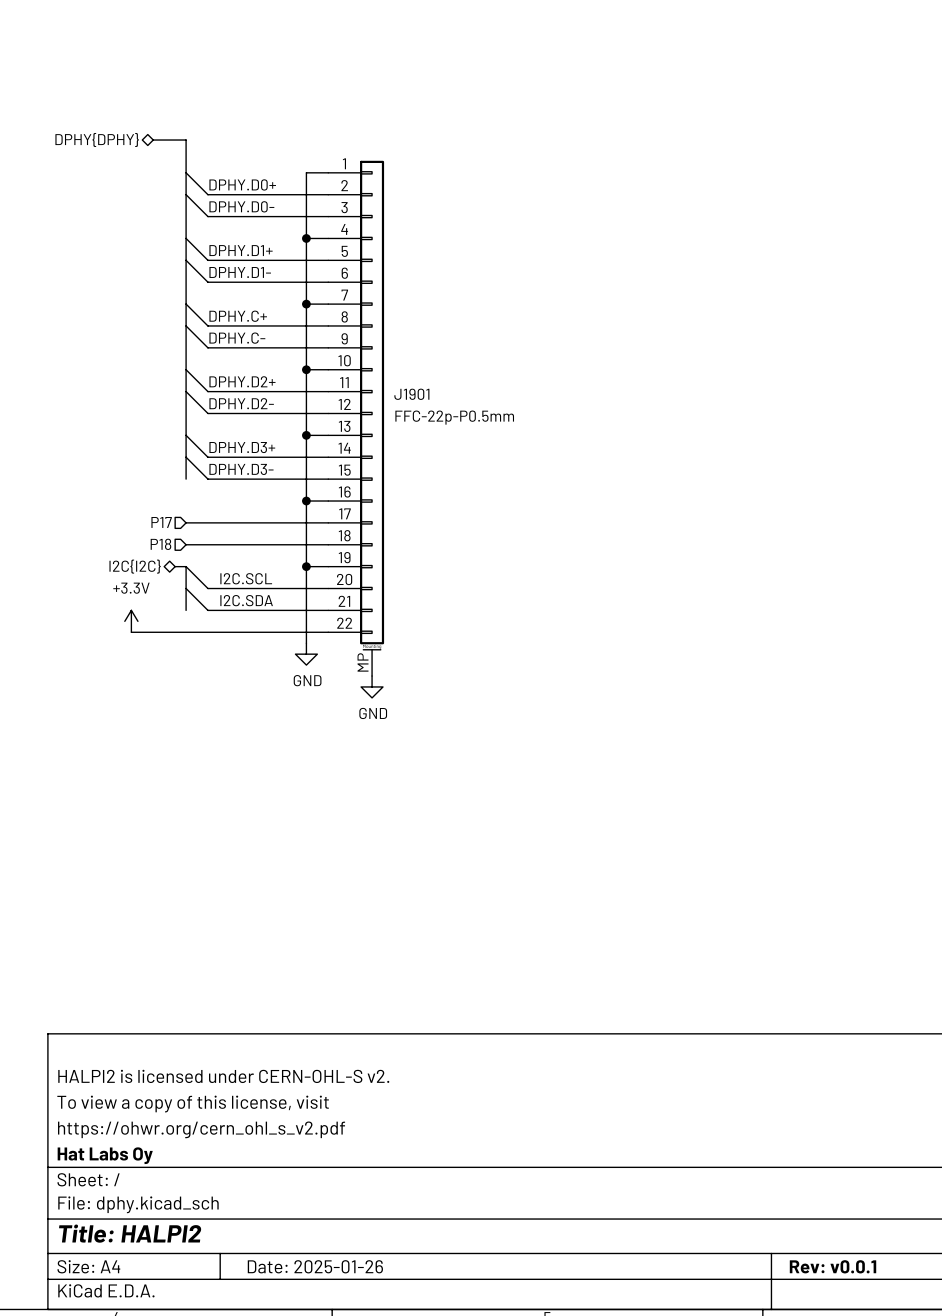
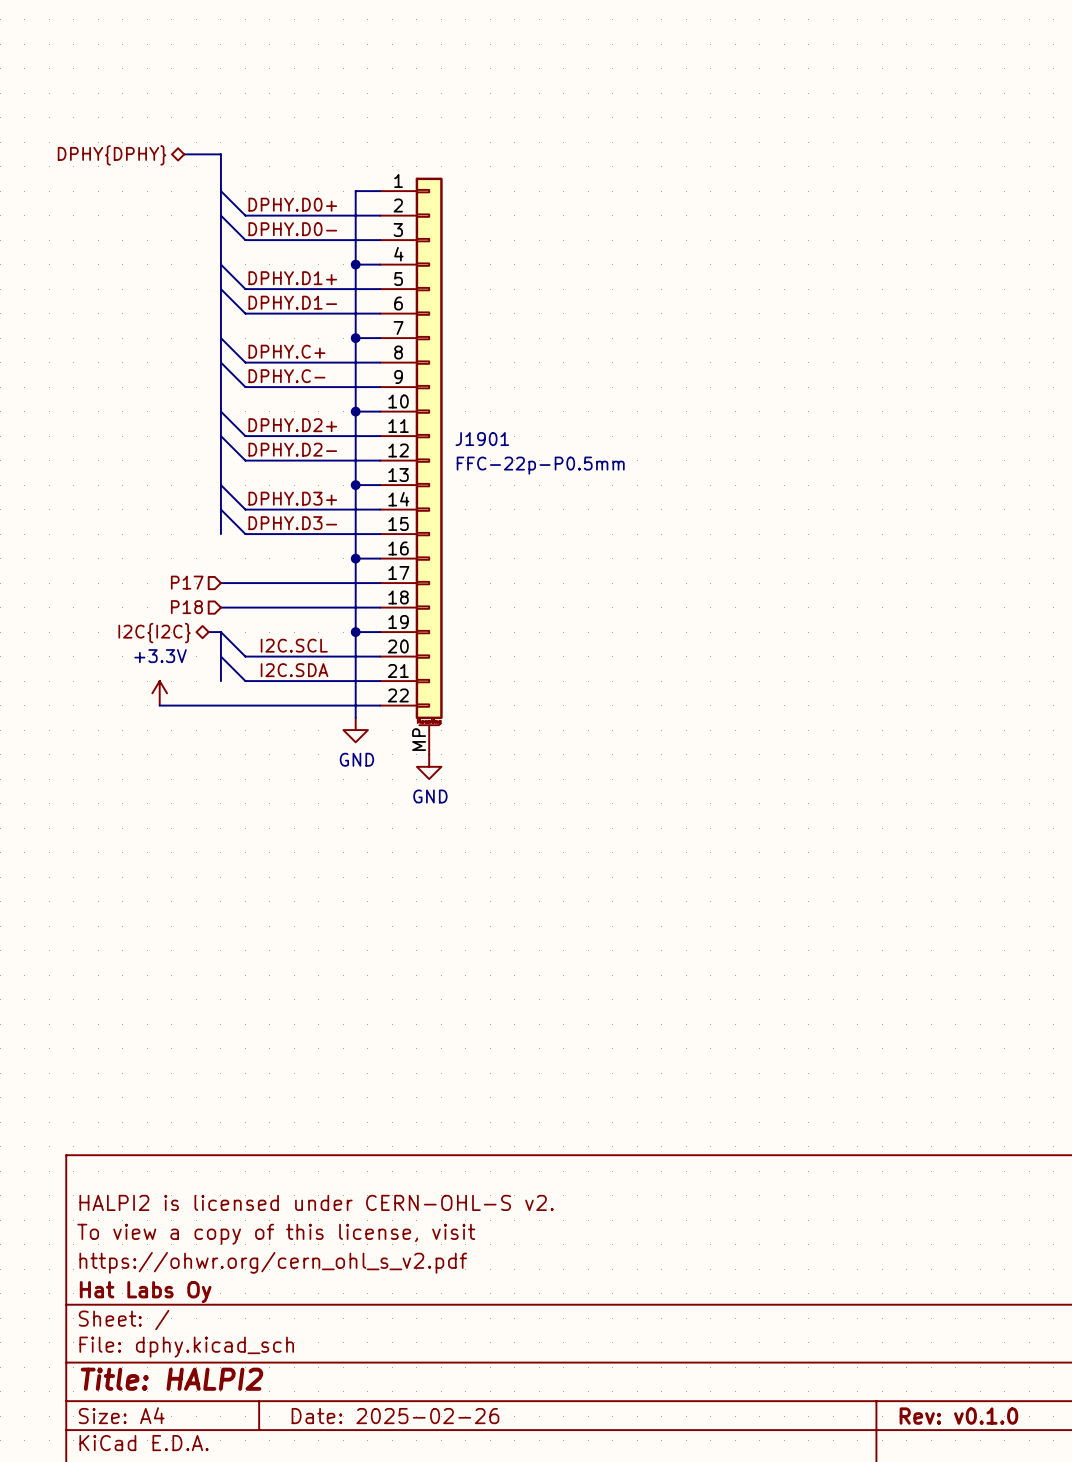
title block: Date: 2025-01-26 (315, 1266) -> Date: 2025-02-26 (395, 1416)
title block: Rev: v0.0.1 (833, 1266) -> Rev: v0.1.0 (958, 1416)

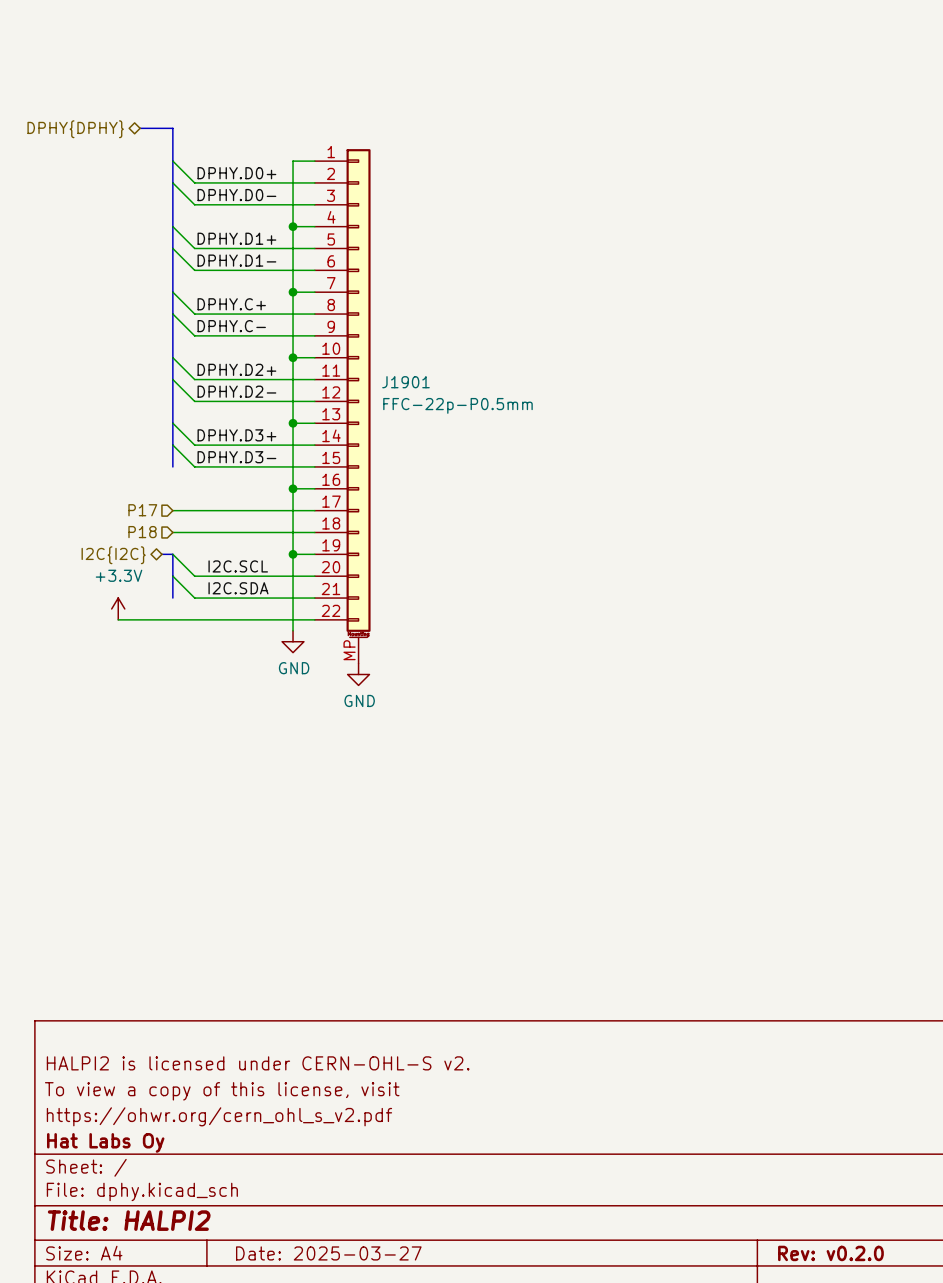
title block: Date: 2025-02-26 (395, 1416) -> Date: 2025-03-27 (328, 1253)
title block: Rev: v0.1.0 (958, 1416) -> Rev: v0.2.0 (830, 1253)

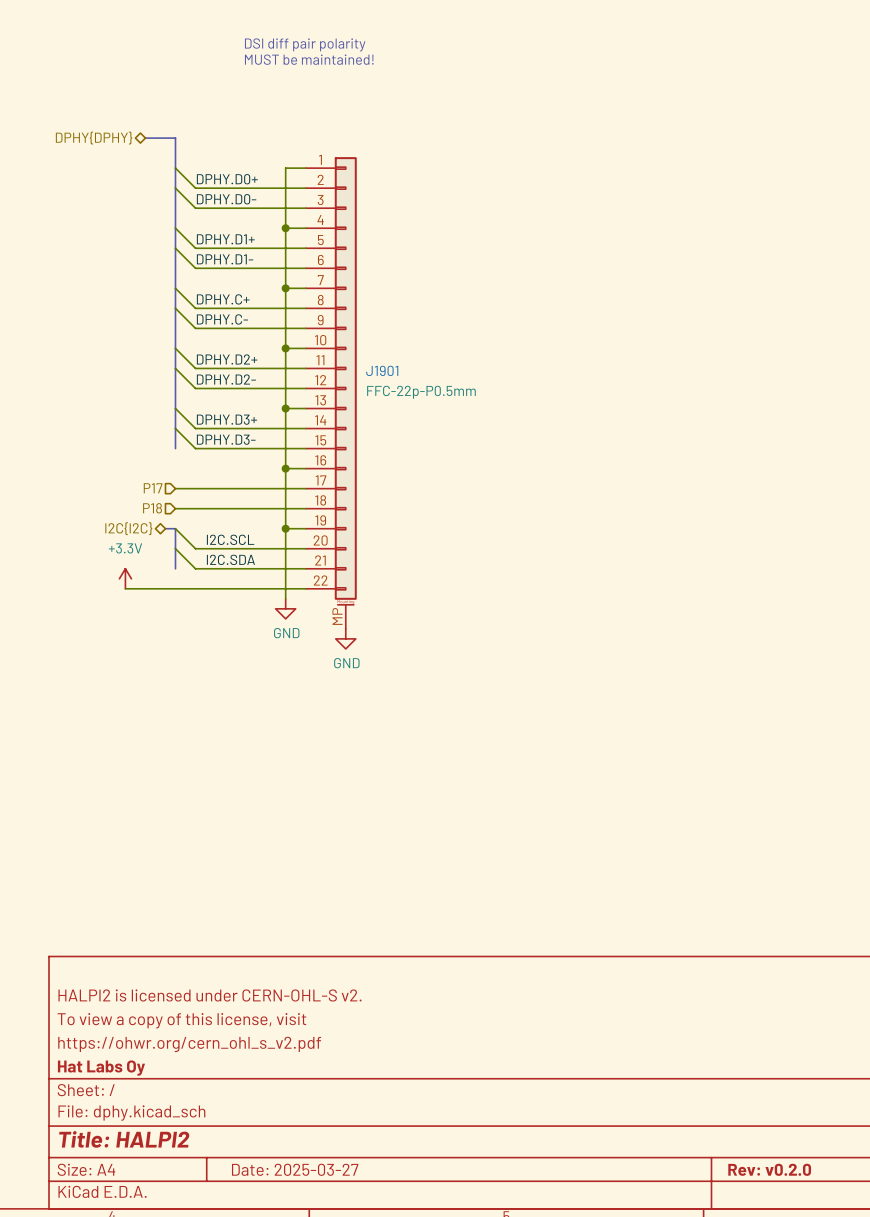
text: none -> DSI diff pair polarity (305, 44)
text: none -> MUST be maintained! (309, 59)

